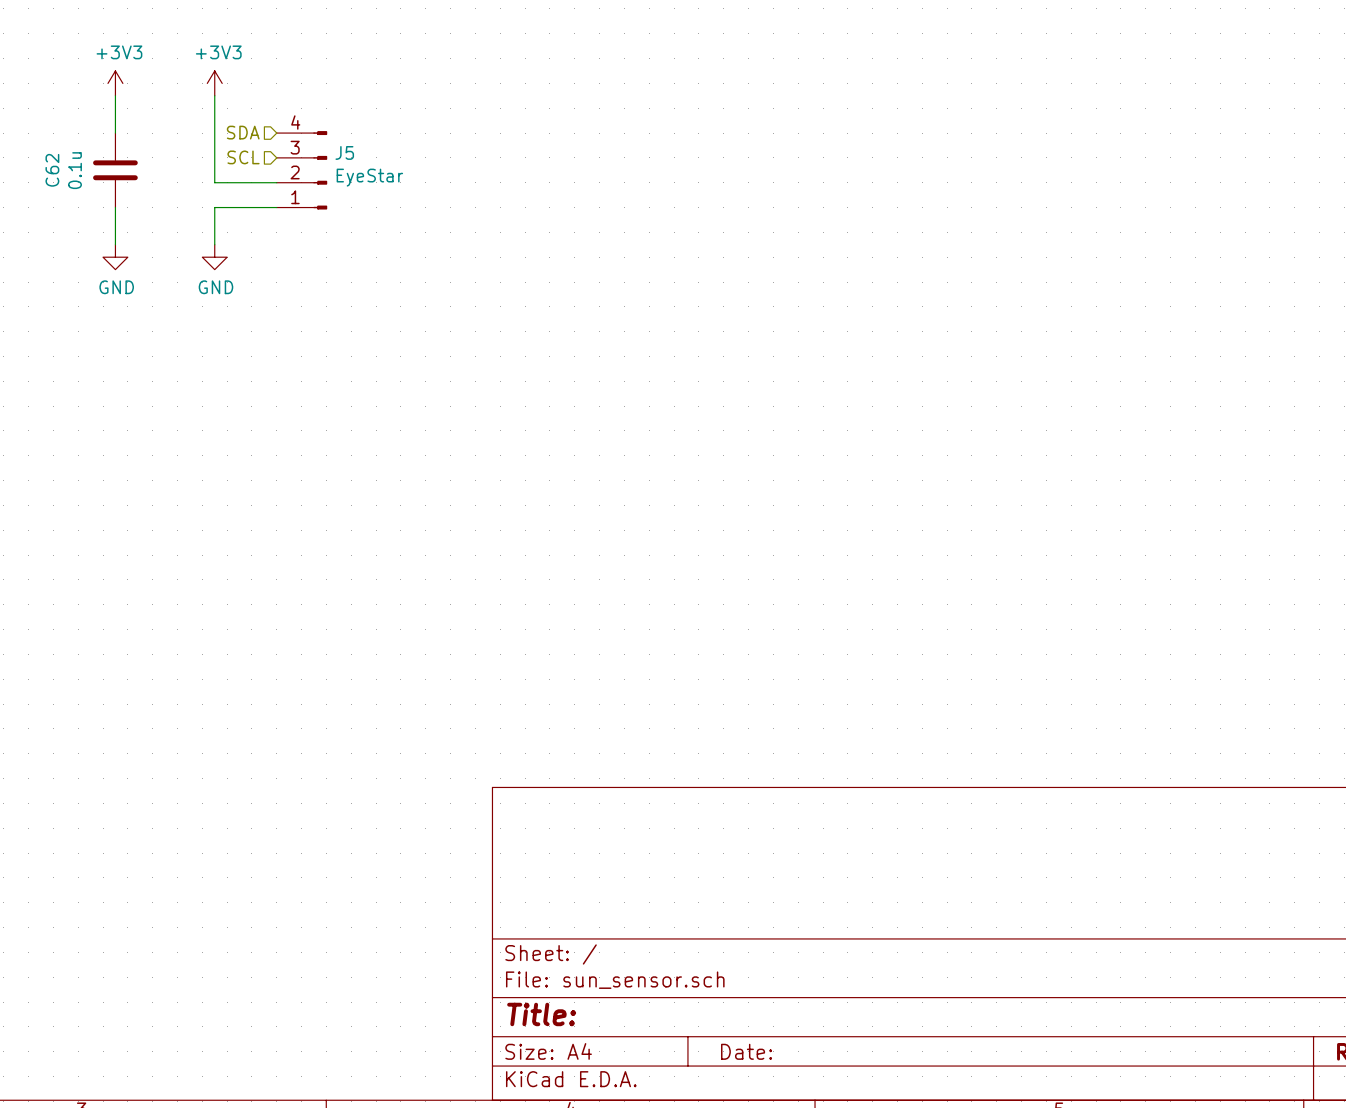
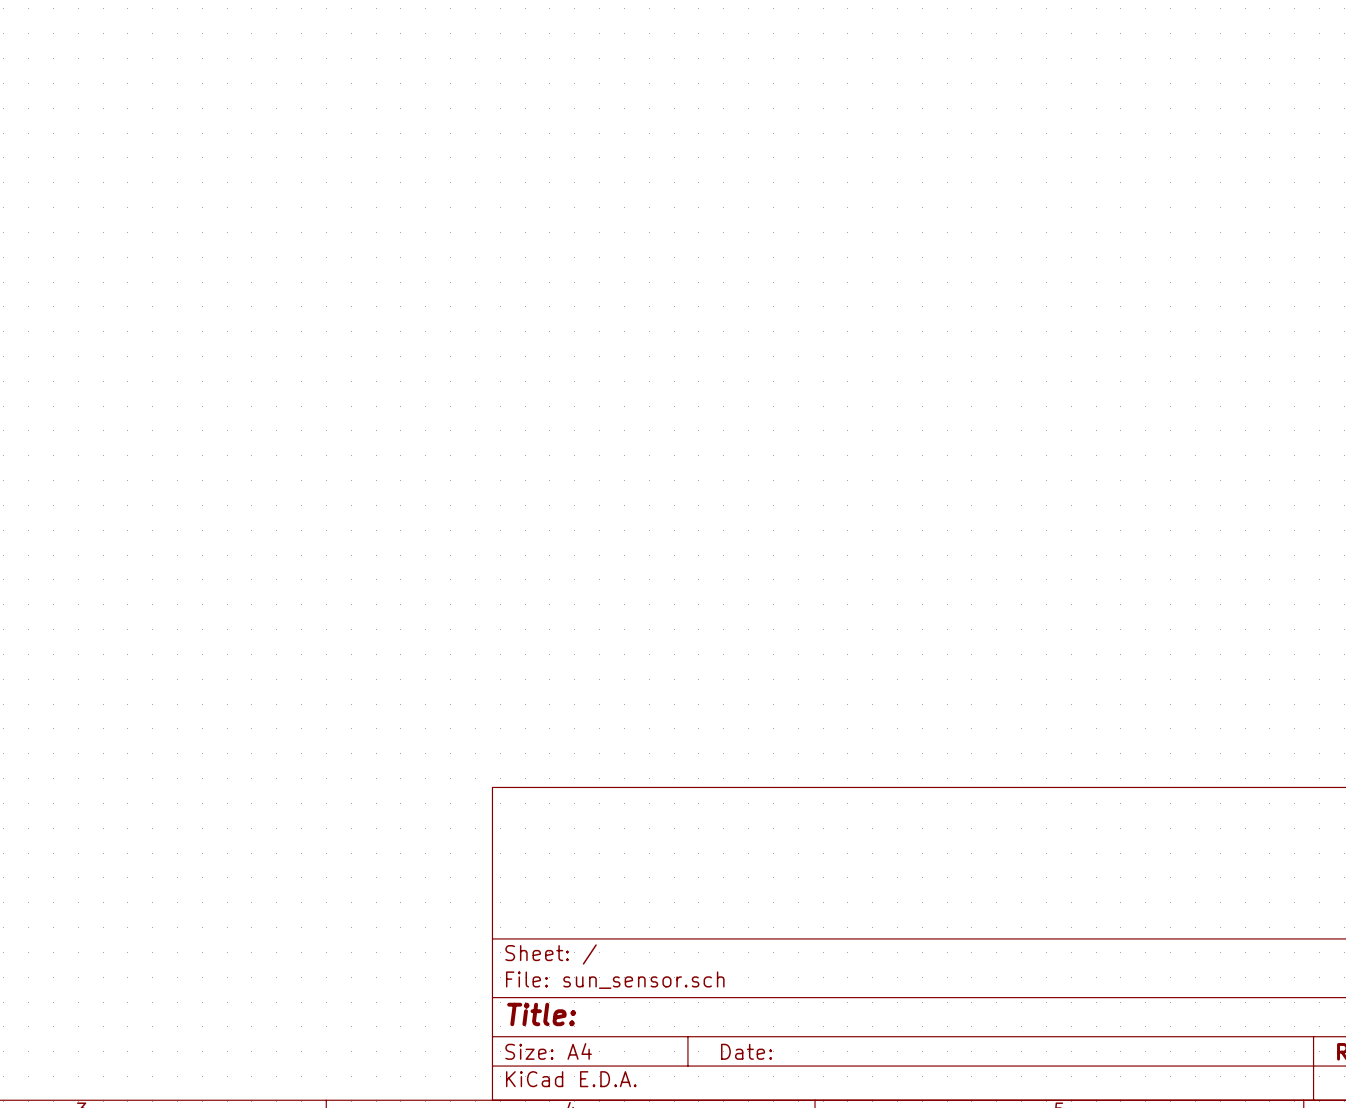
power symbol: +3V3 (115, 83) -> none
power symbol: +3V3 (214, 83) -> none
wire: (115, 95) (115, 133) -> none
wire: (214, 95) (214, 182) (276, 182) -> none
hierarchical label: SDA (243, 132) -> none
hierarchical label: SCL (243, 157) -> none
C62: 0.1u (115, 170) -> none
J5: EyeStar (302, 170) -> none
wire: (115, 207) (115, 244) -> none
wire: (276, 207) (214, 207) (214, 244) -> none
power symbol: GND (115, 257) -> none
power symbol: GND (214, 257) -> none

